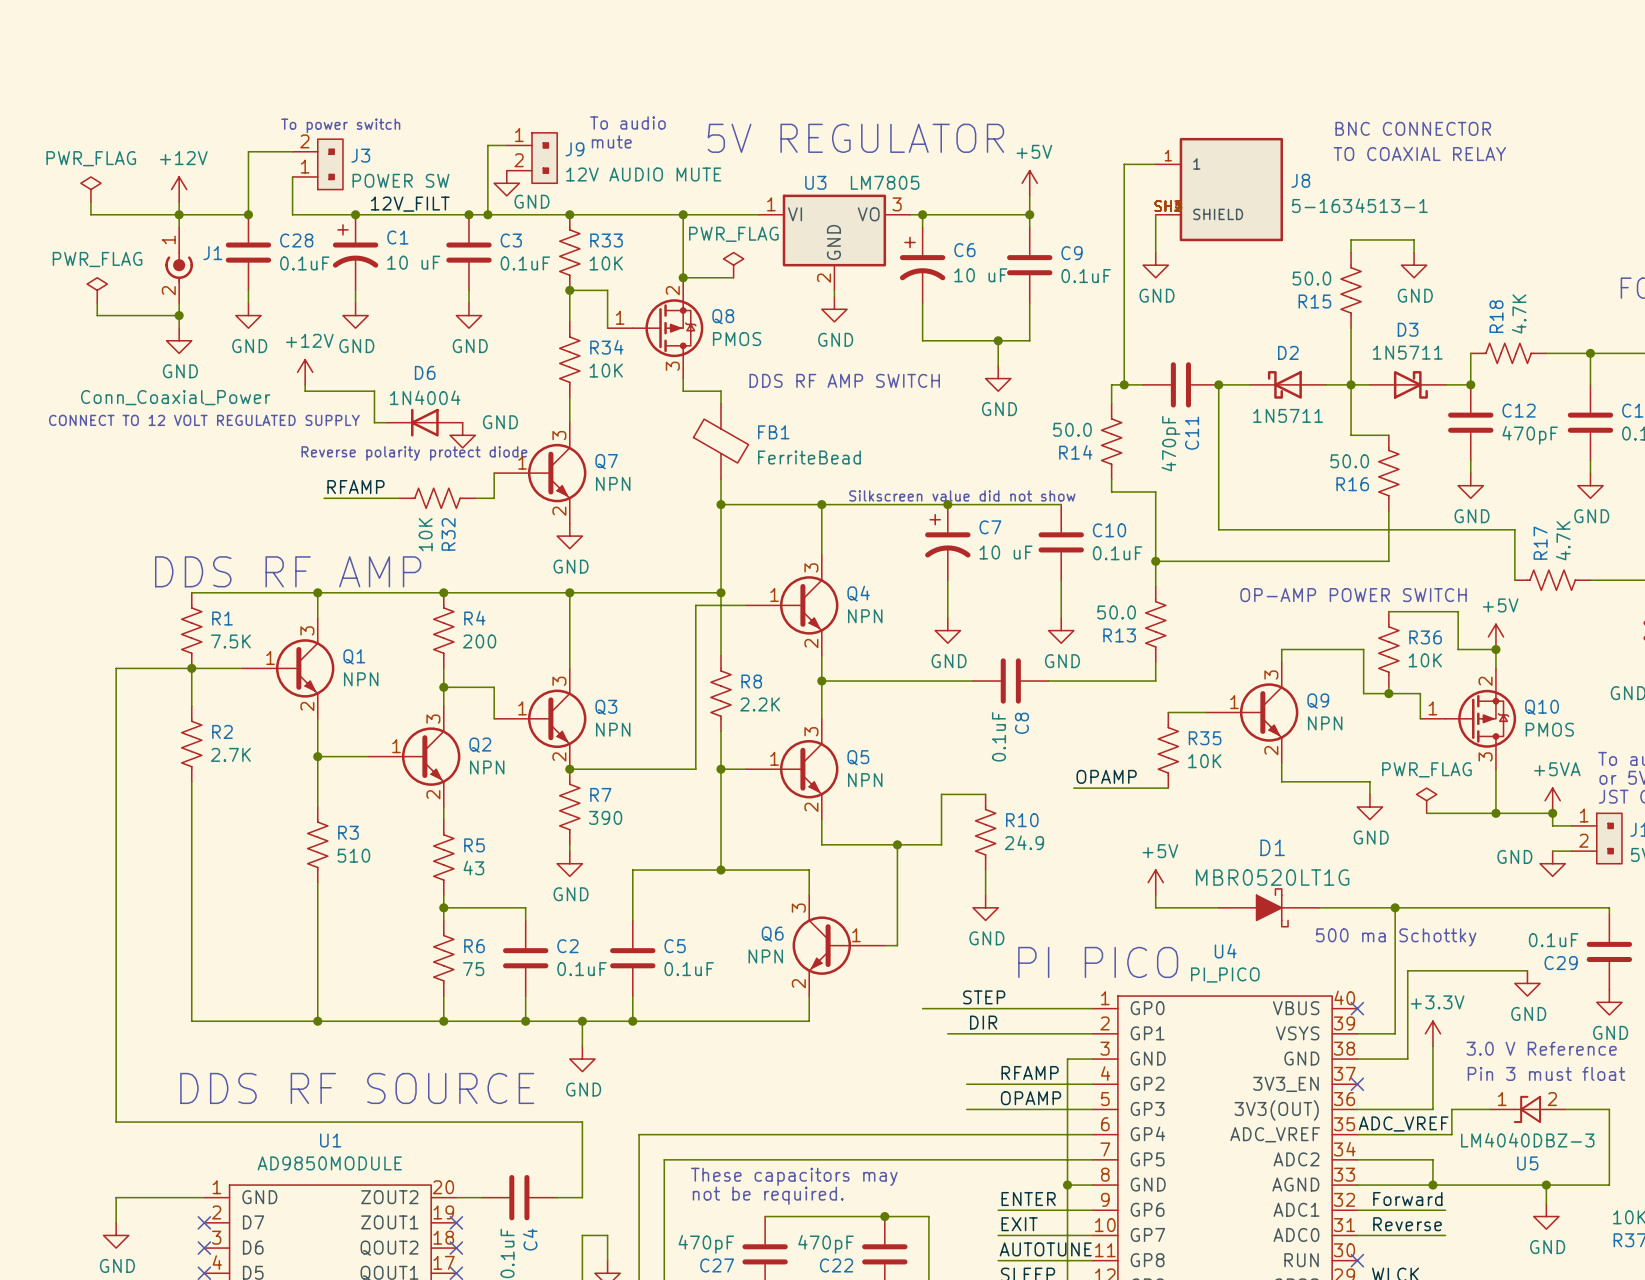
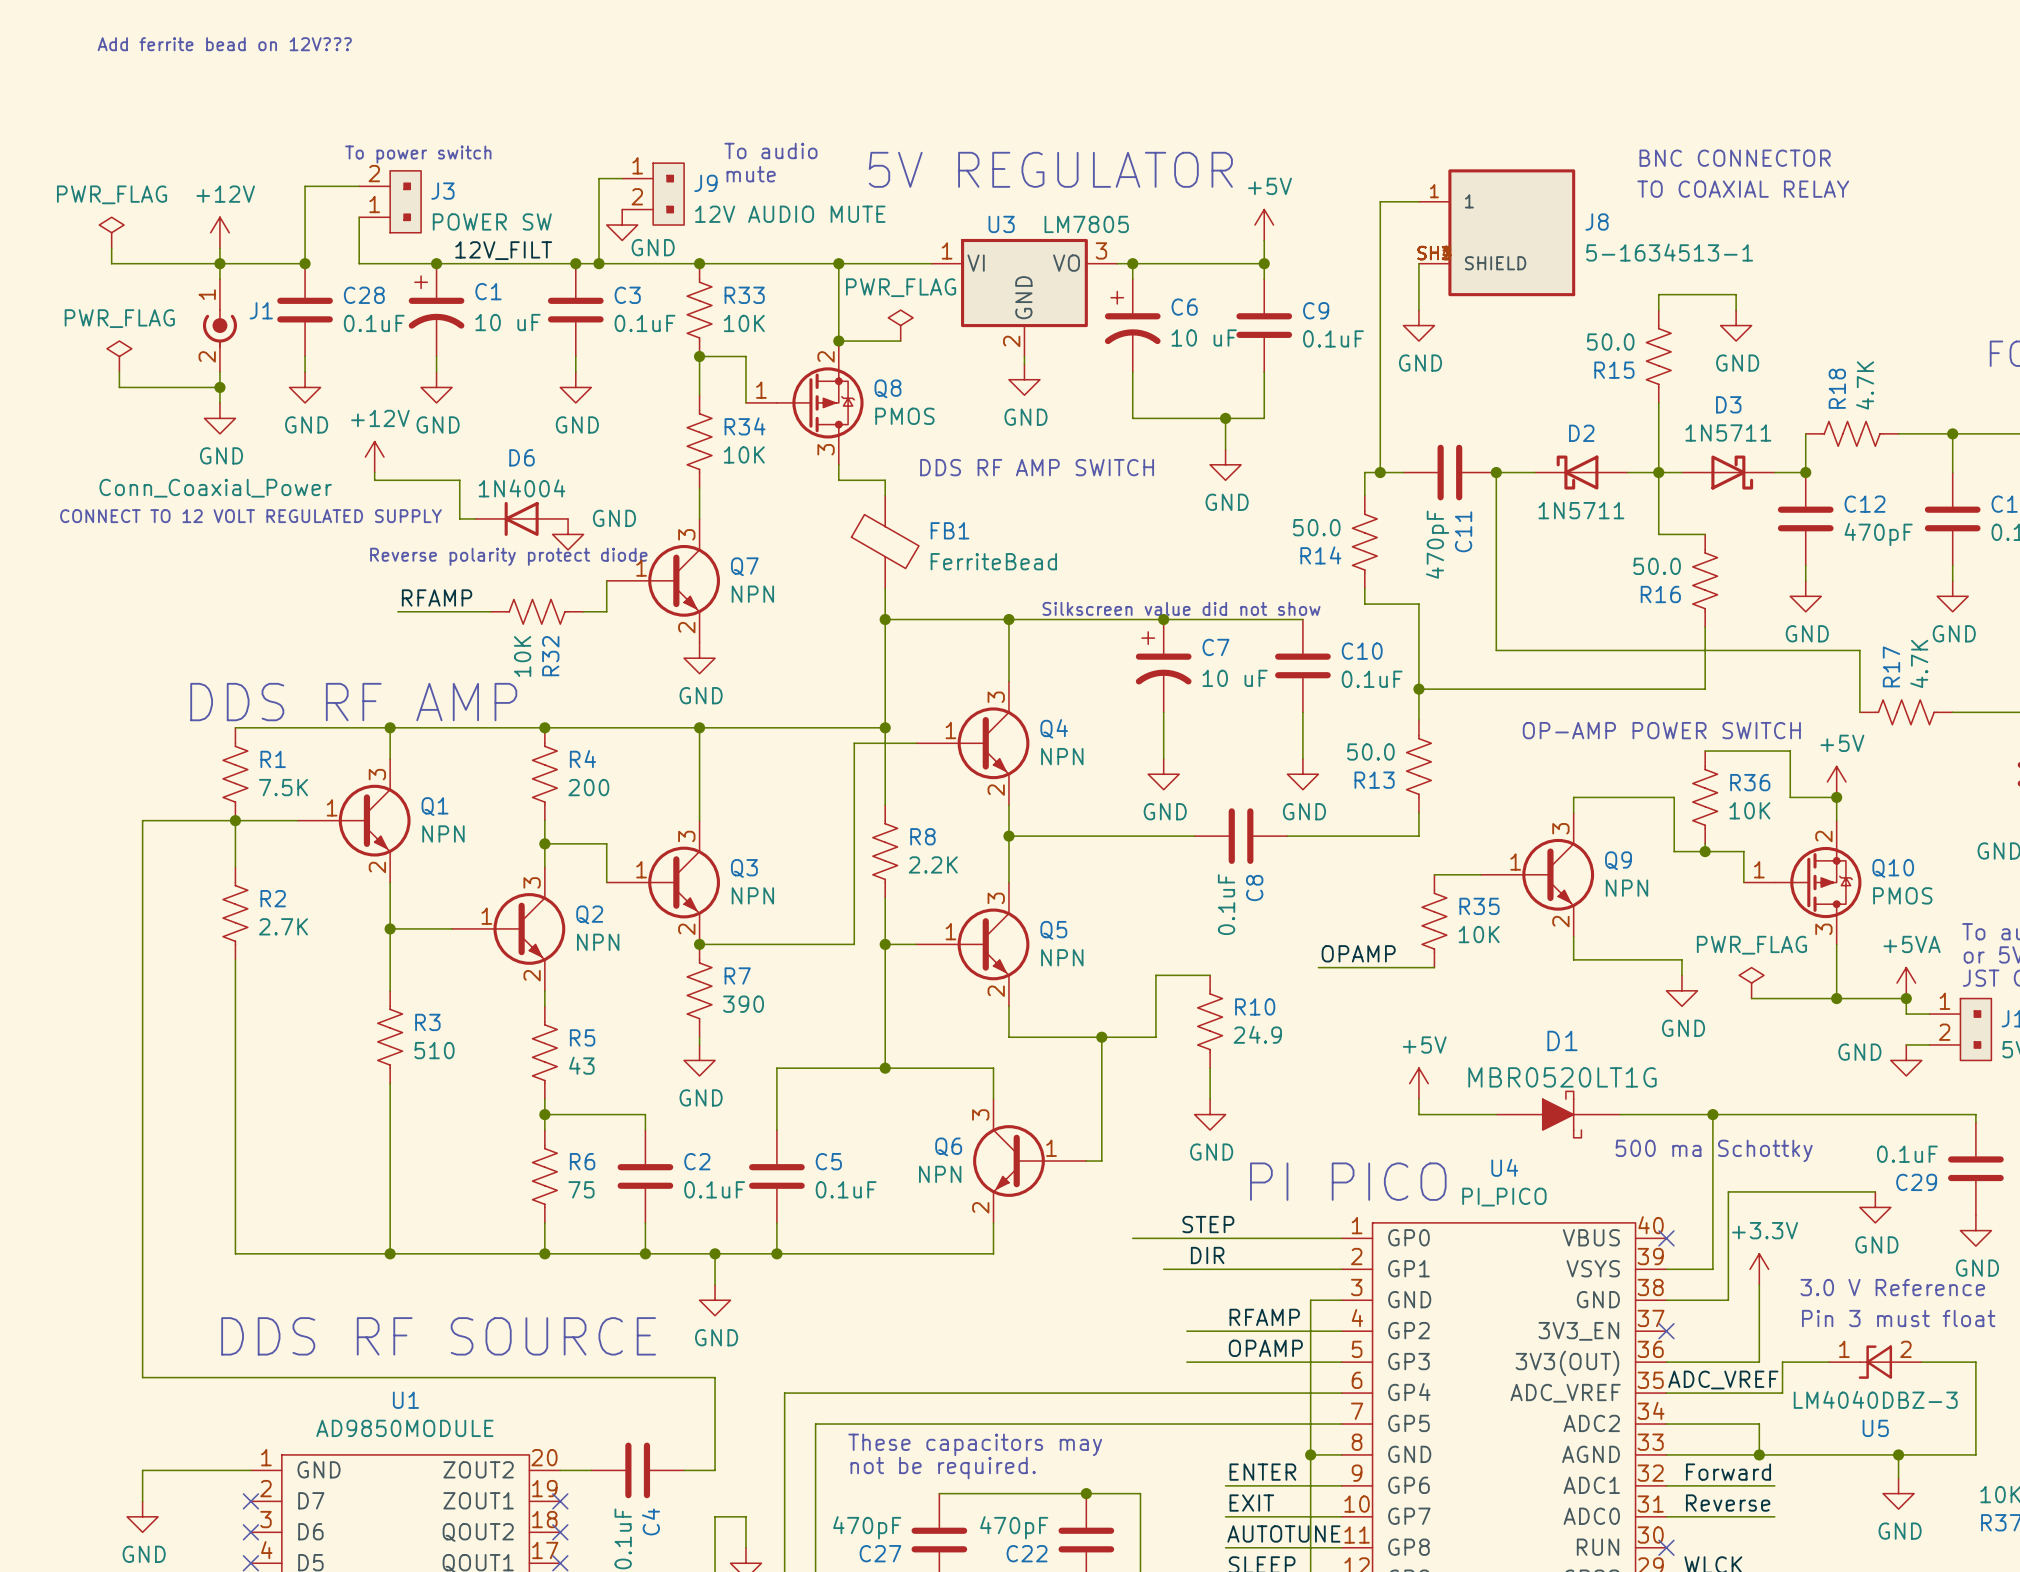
text: none -> Add ferrite bead on 12V??? (224, 44)

